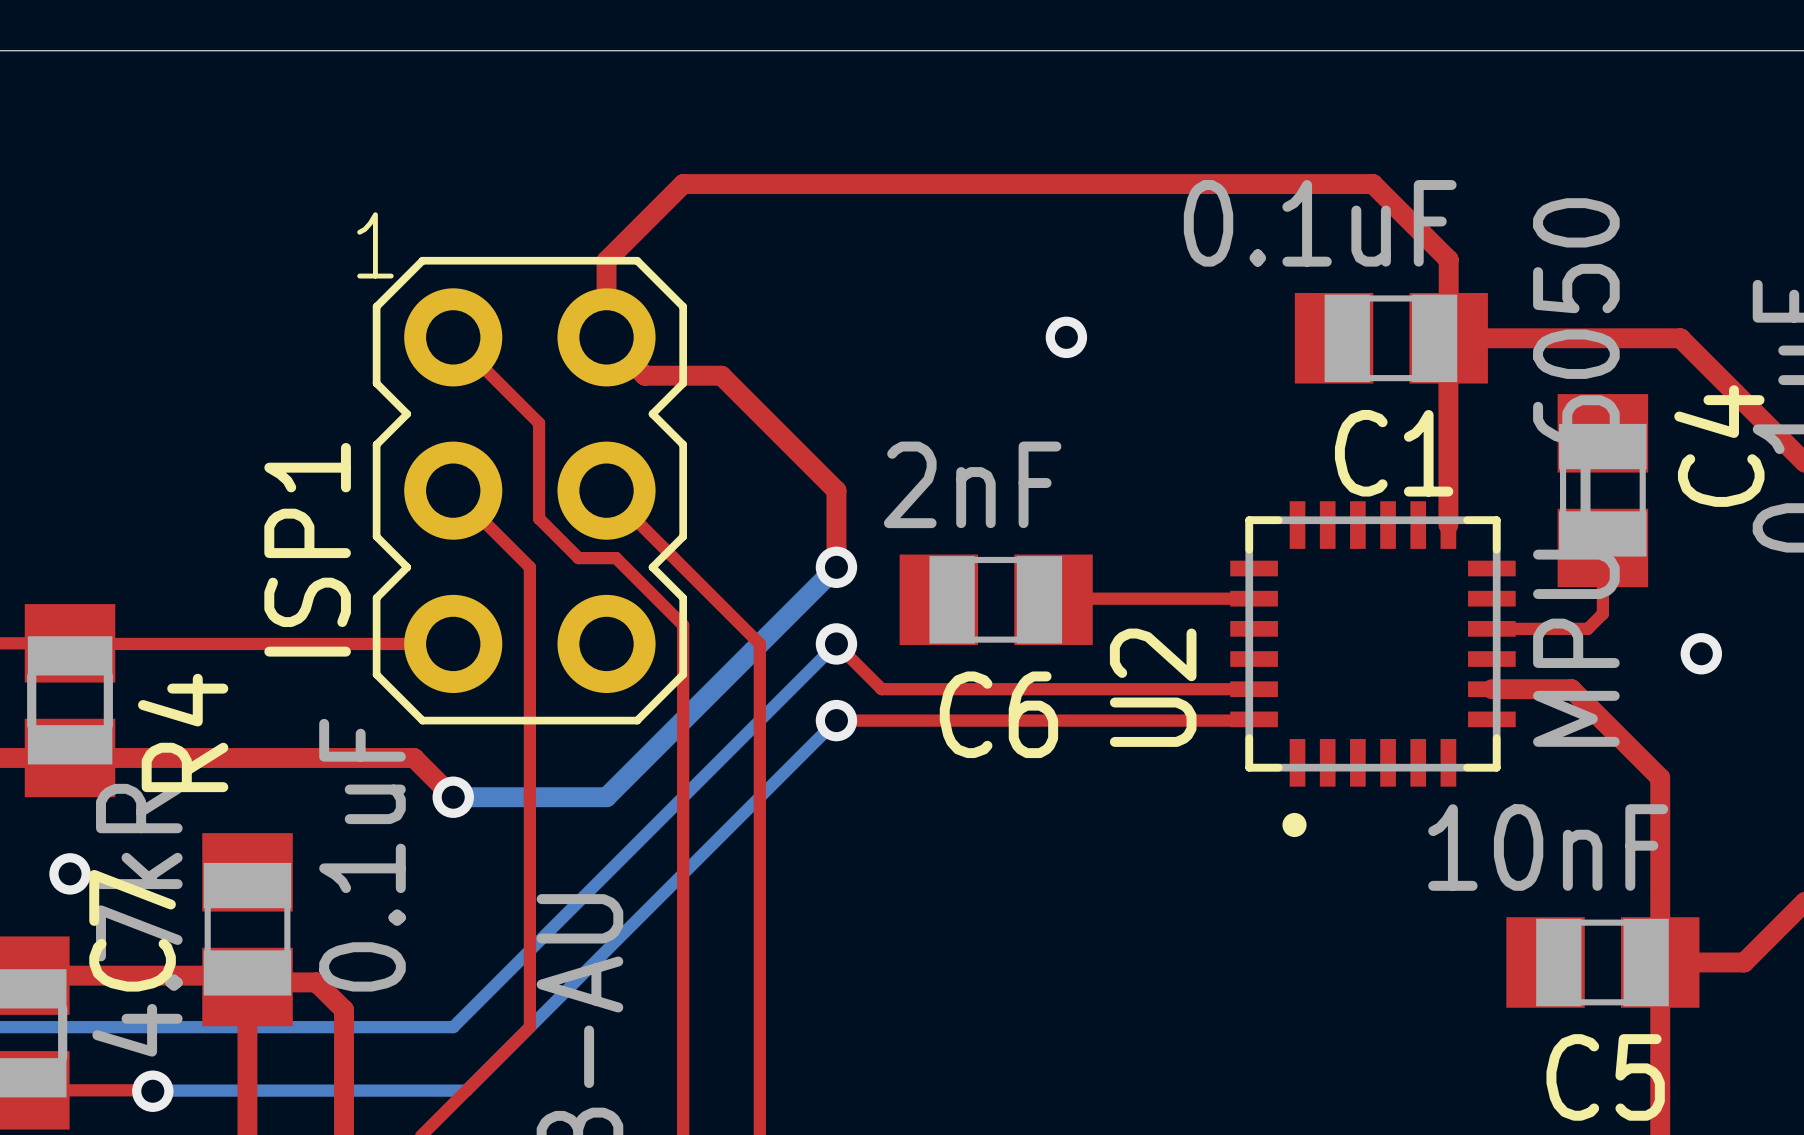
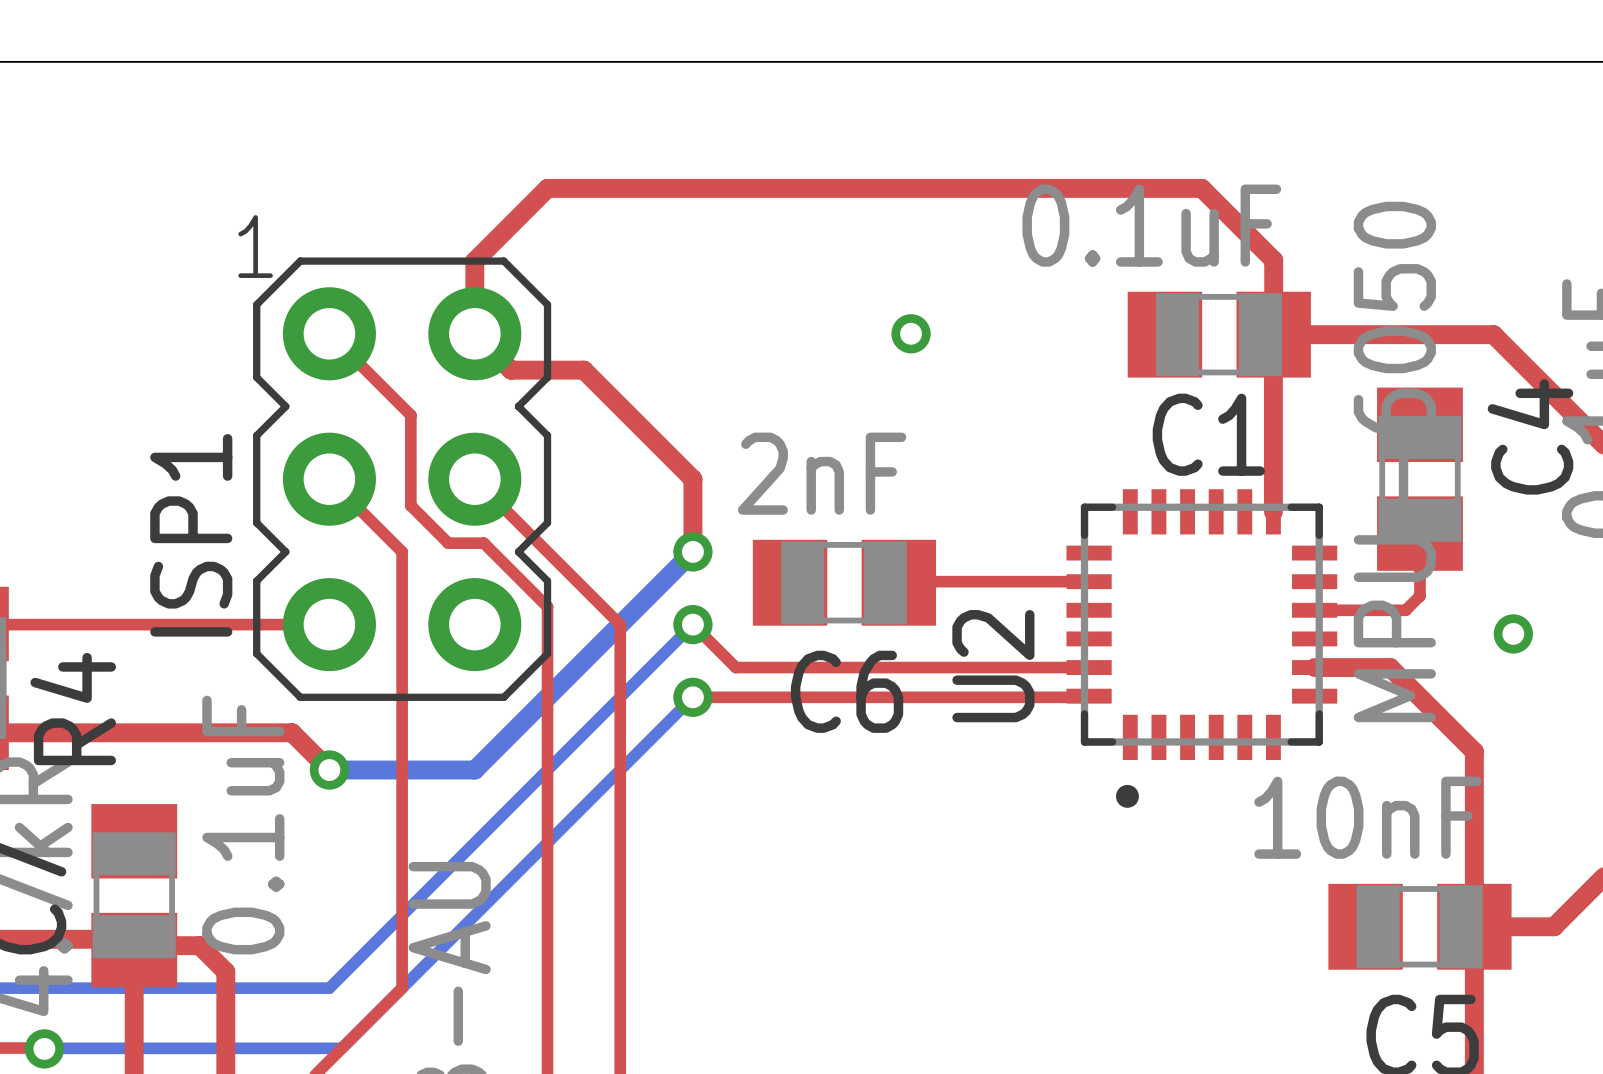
C1 name position: C1 (1394, 453) -> C1 (1208, 434)

